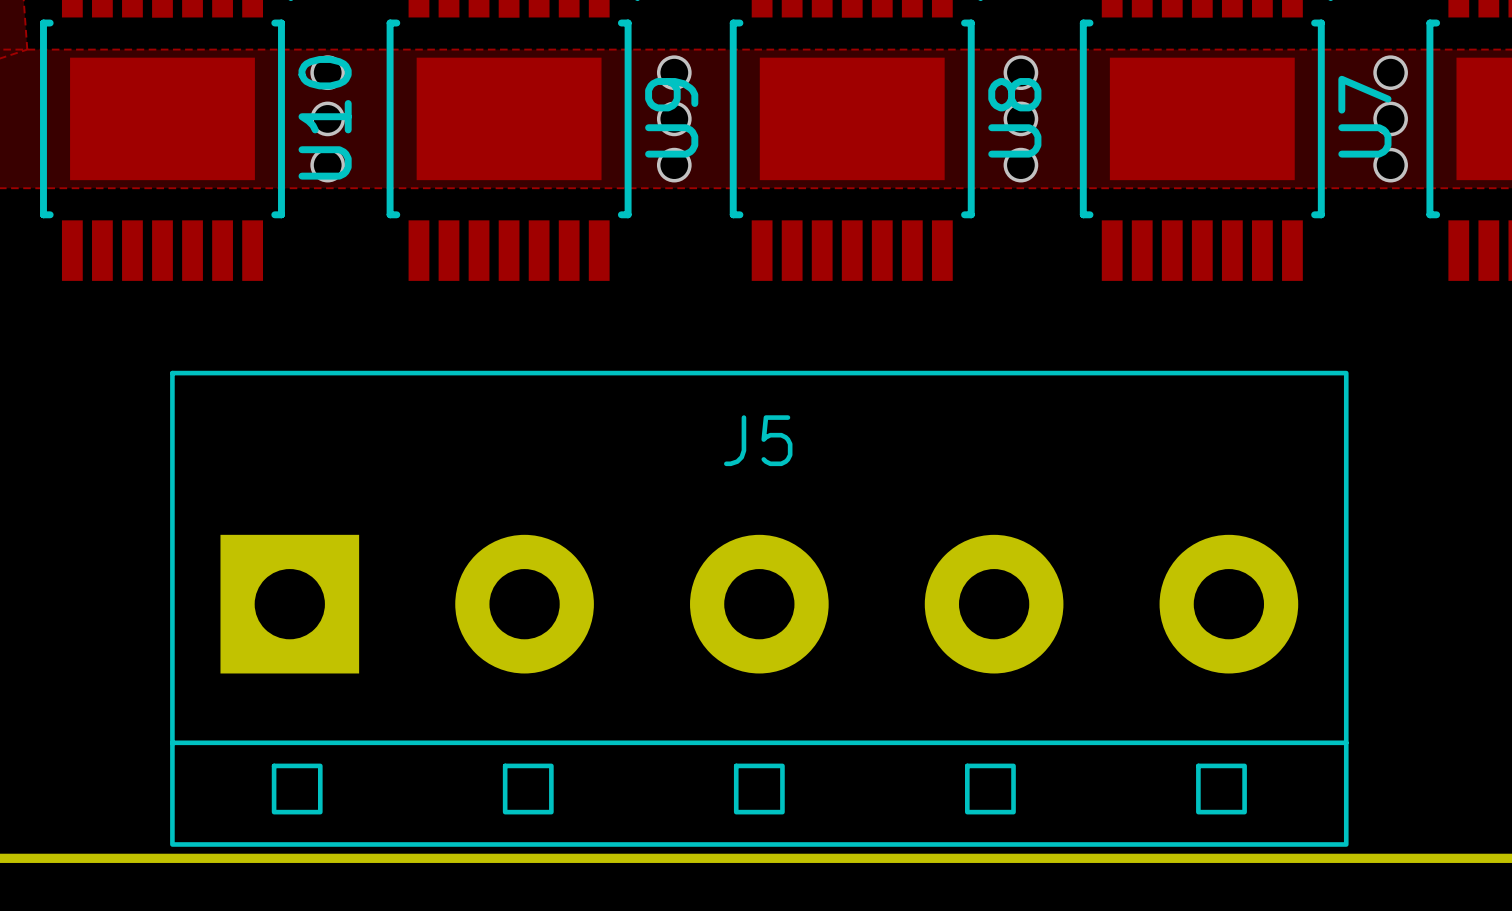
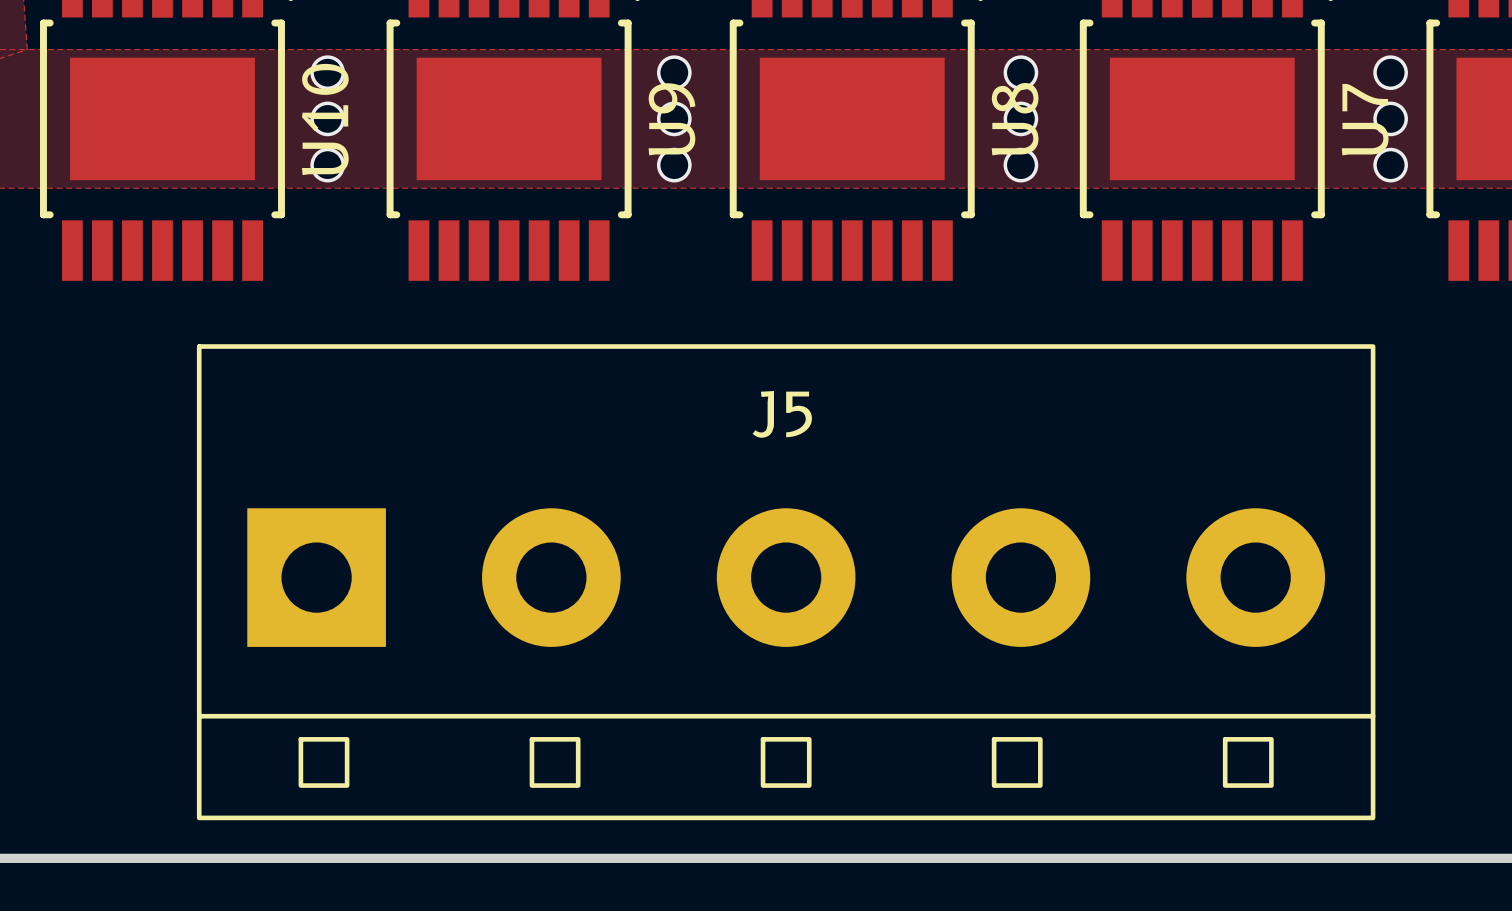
J5 position: (759, 608) -> (786, 582)

